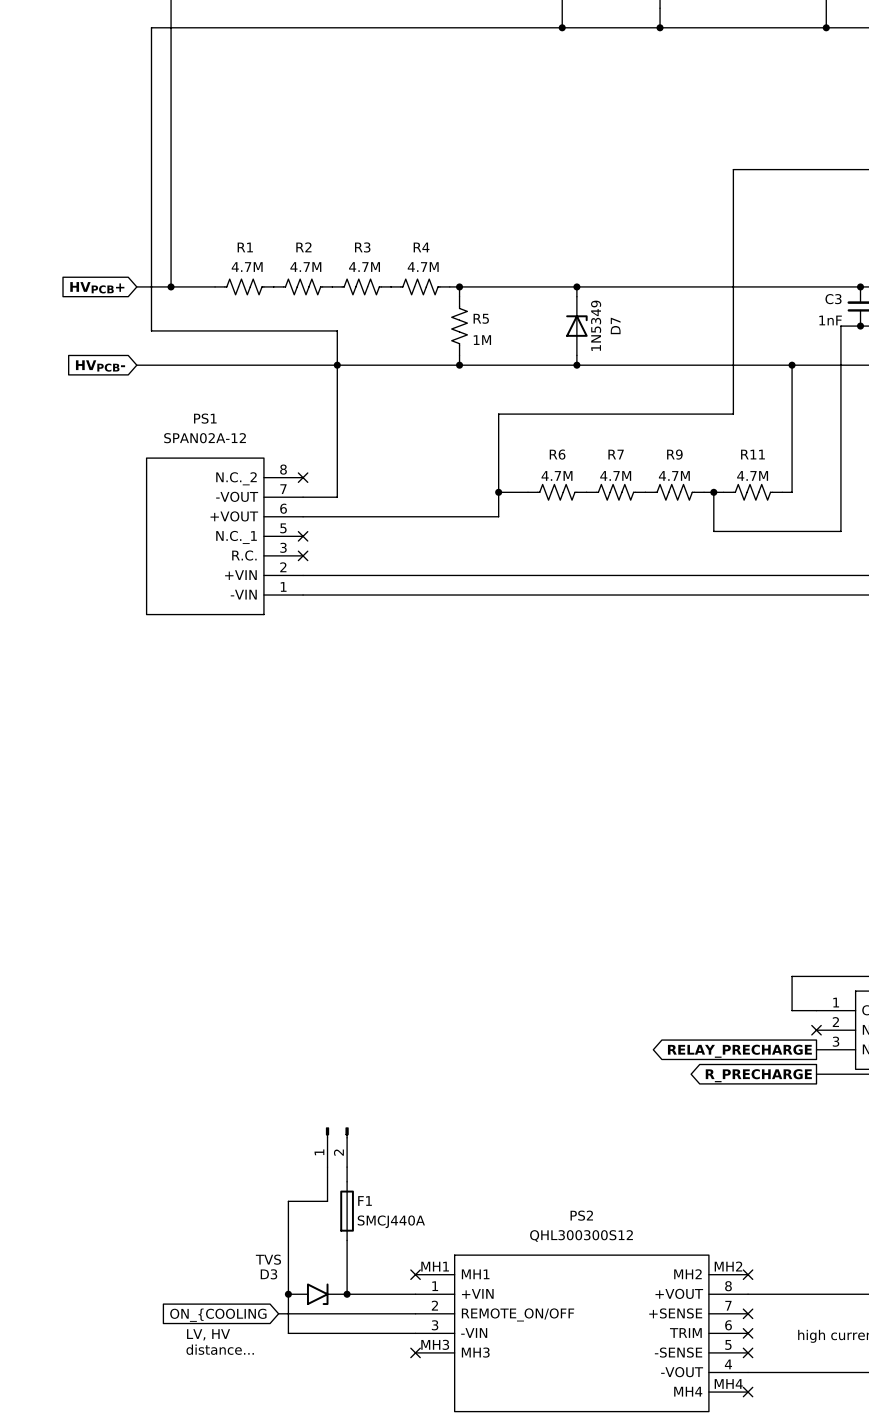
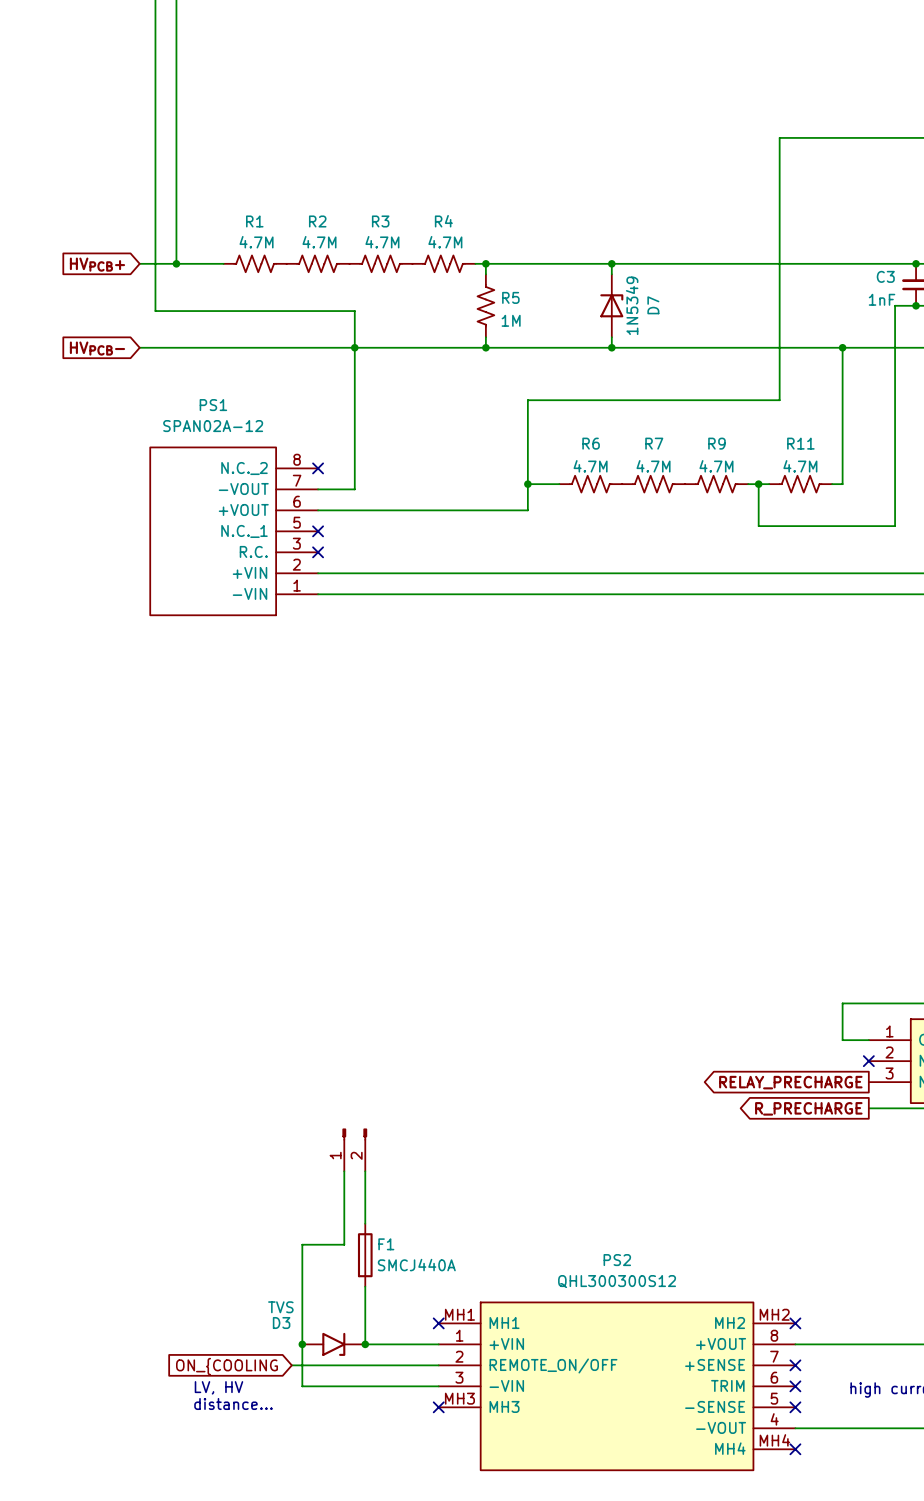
part position: (337, 1147) -> (354, 1149)

